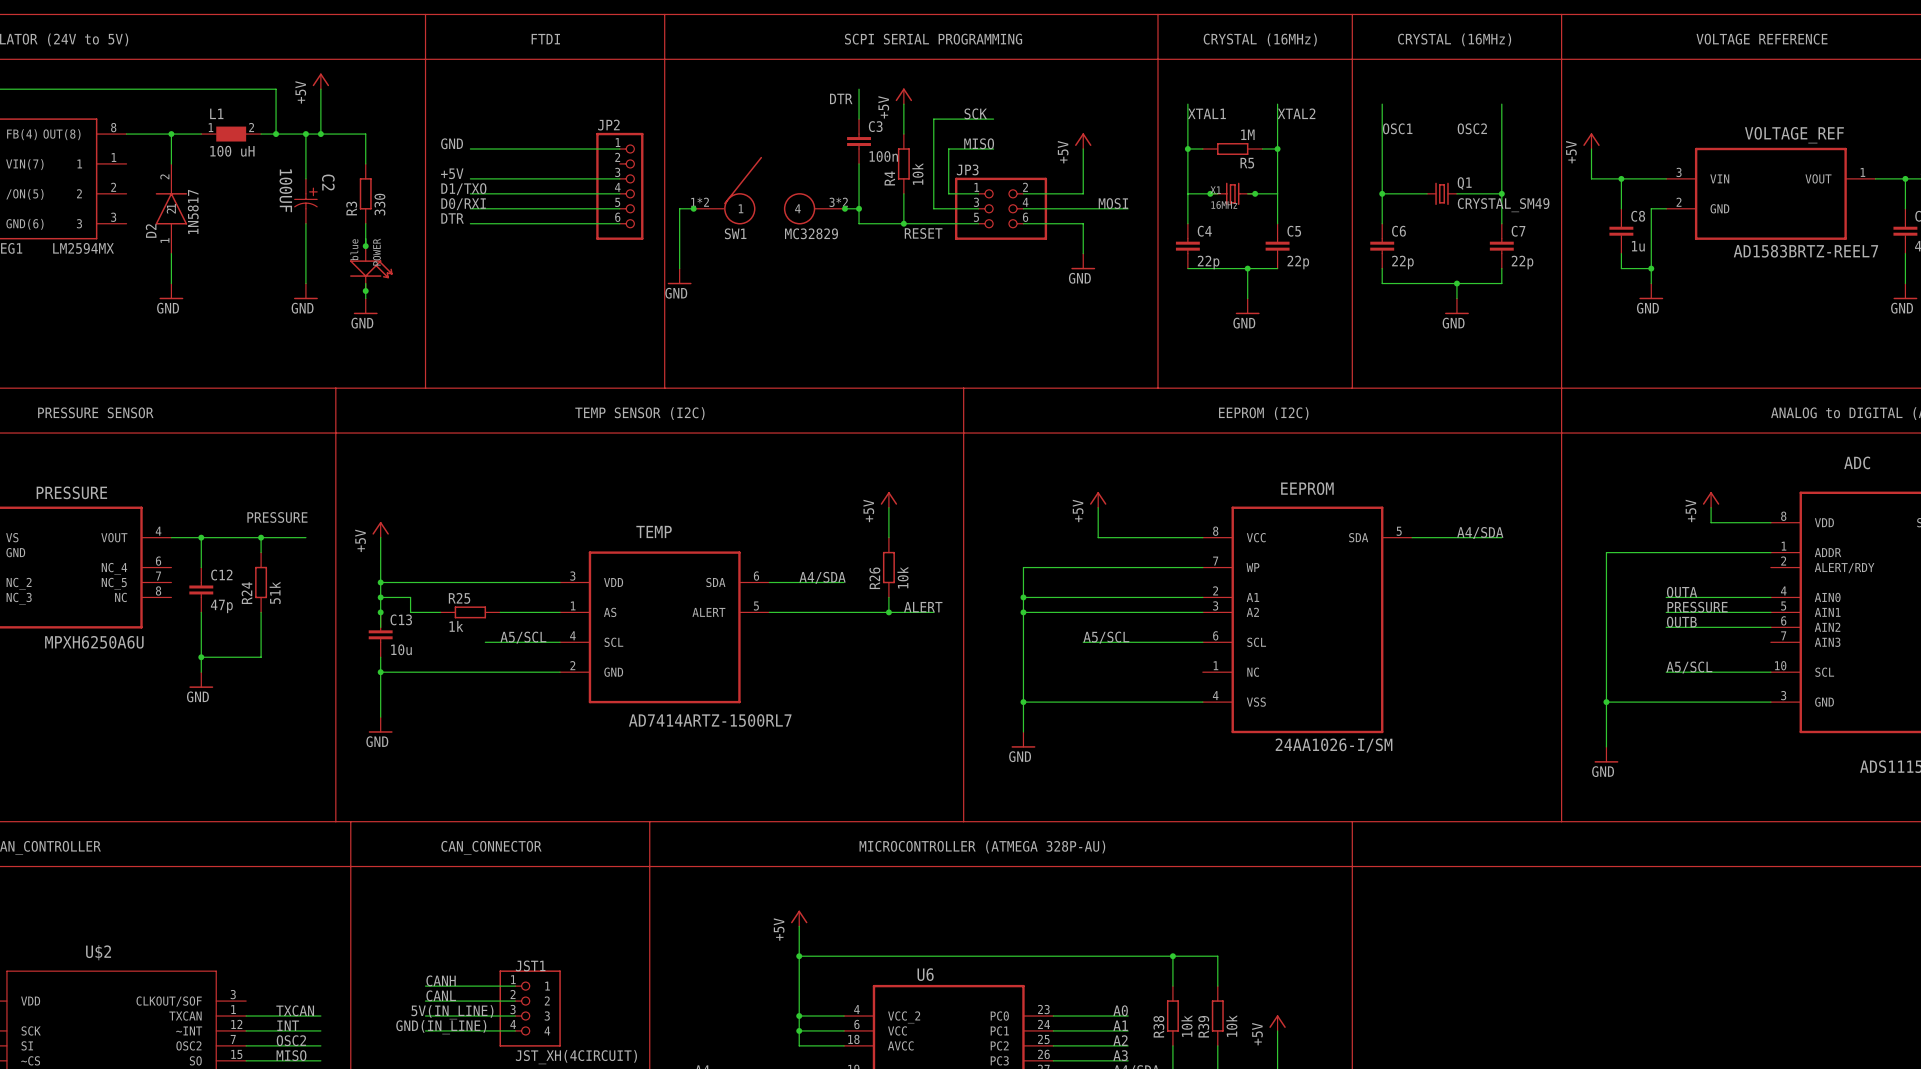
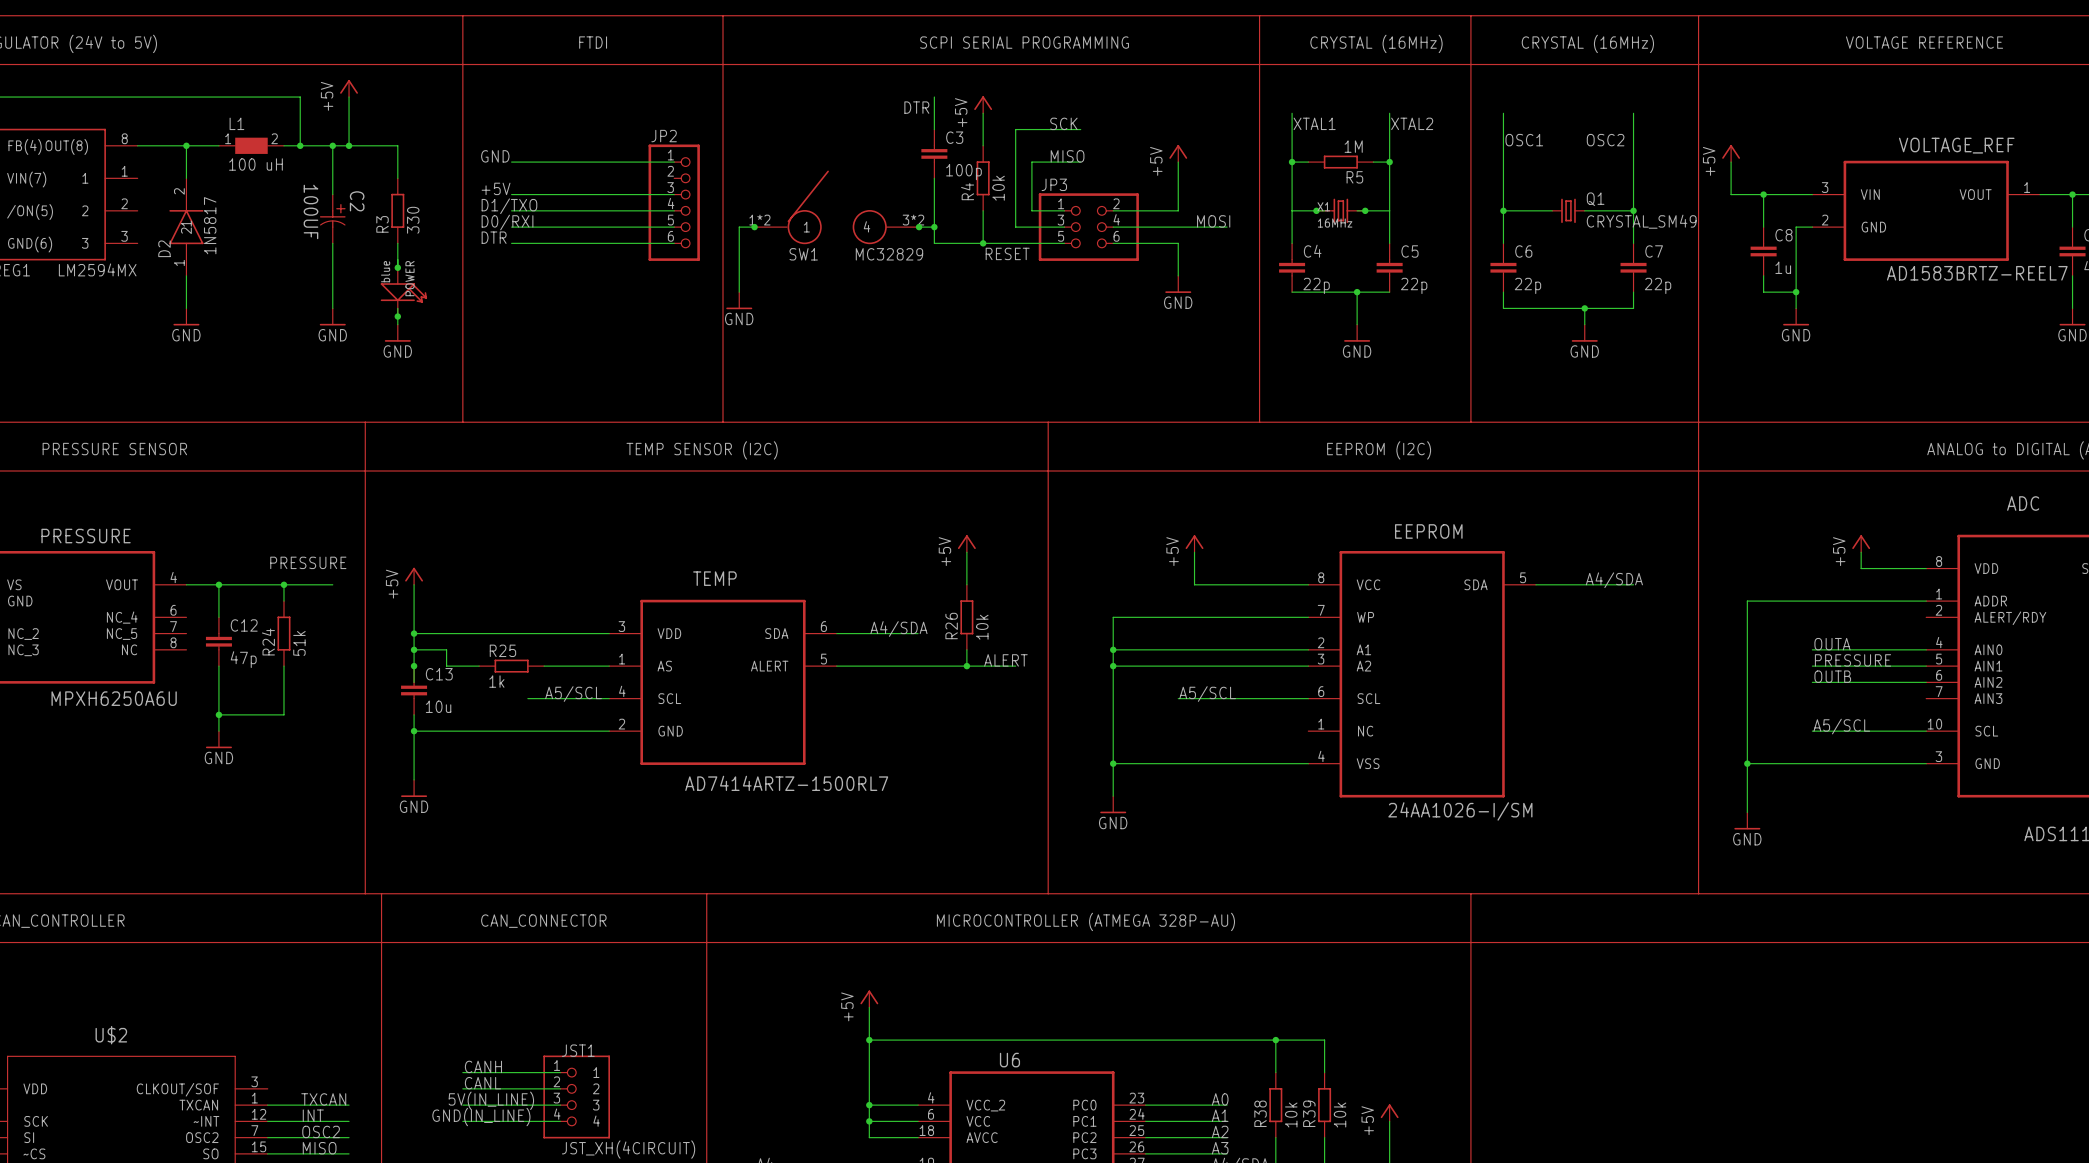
C3 value: 100n (883, 156) -> 100p (963, 172)

